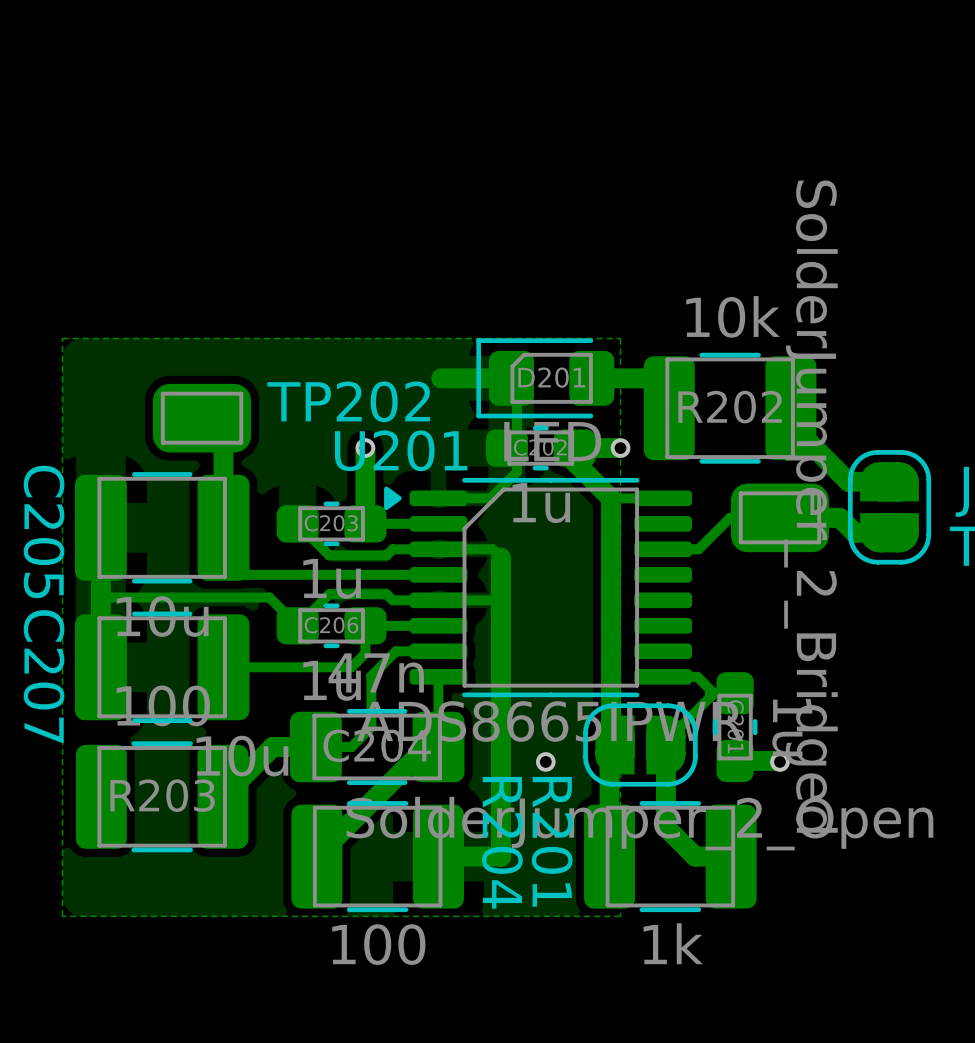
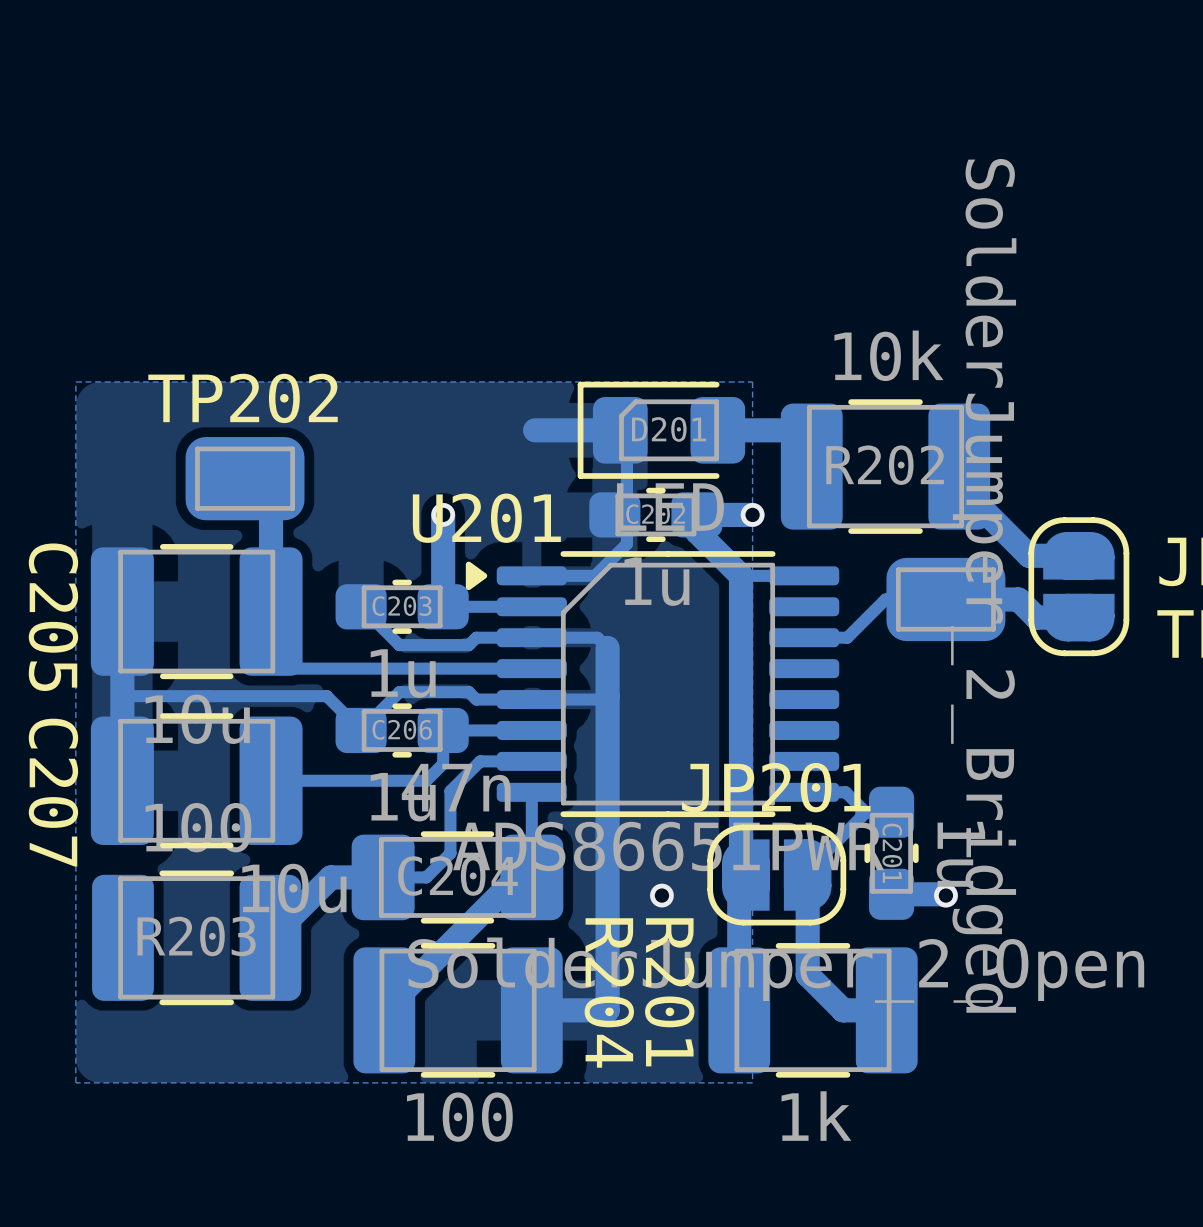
TP202 name position: TP202 (348, 401) -> TP202 (243, 398)
JP201 name: none -> JP201 (776, 787)

